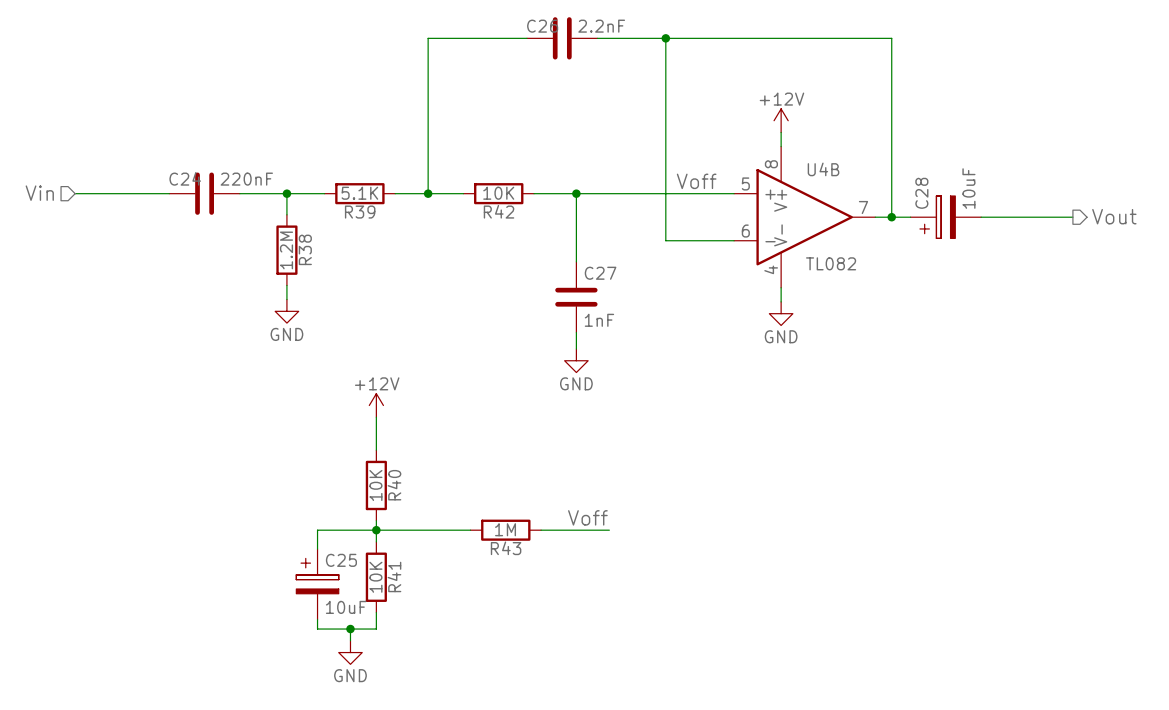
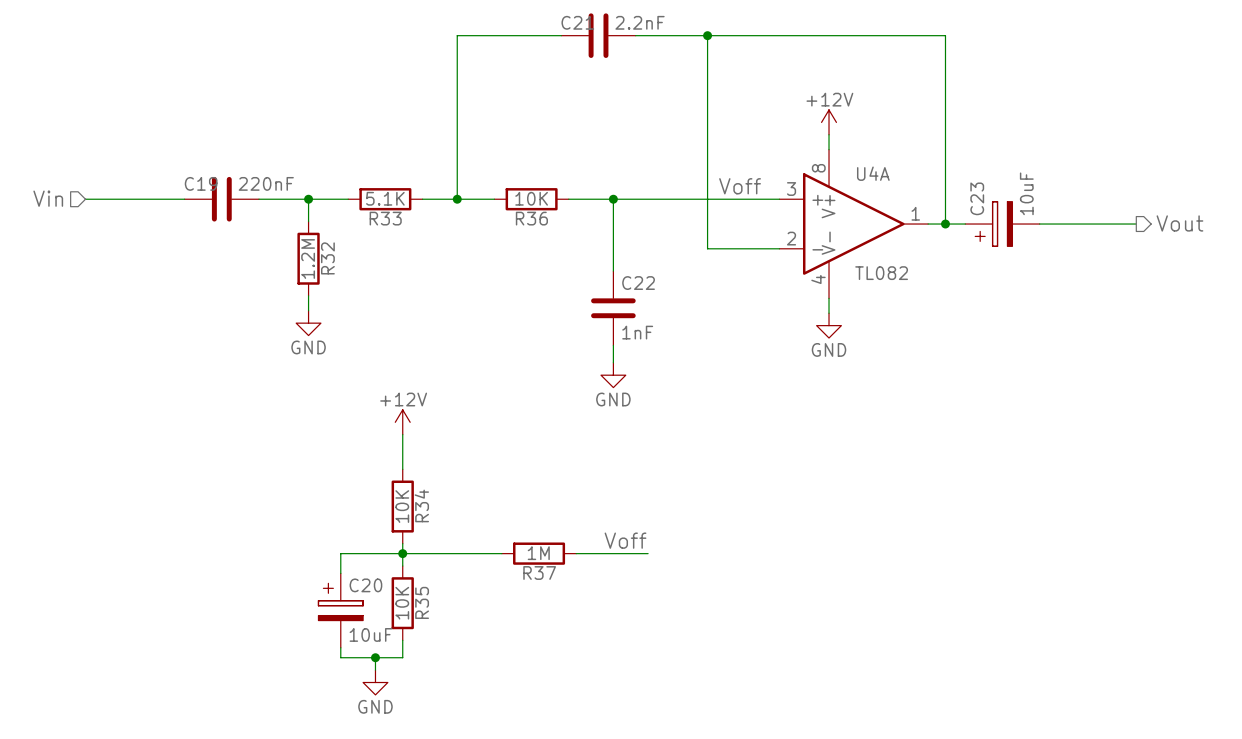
C26 name: C26 (542, 26) -> C21 (577, 22)
U4B name: U4B (823, 169) -> U4A (873, 173)
C24 name: C24 (185, 178) -> C19 (201, 183)
U4B pin number: 5 (745, 183) -> 3 (791, 189)
C28 name: C28 (921, 193) -> C23 (977, 198)
U4B pin number: 7 (863, 207) -> 1 (915, 213)
R42 name: R42 (499, 211) -> R36 (531, 218)
R39 name: R39 (360, 212) -> R33 (385, 218)
U4B pin number: 6 (745, 231) -> 2 (791, 238)
R38 name: R38 (305, 249) -> R32 (327, 258)
C27 name: C27 (600, 273) -> C22 (638, 283)
R40 name: R40 (394, 485) -> R34 (421, 505)
R43 name: R43 (506, 548) -> R37 (539, 572)
C25 name: C25 (341, 560) -> C20 (365, 585)
R41 name: R41 (394, 576) -> R35 (422, 602)

